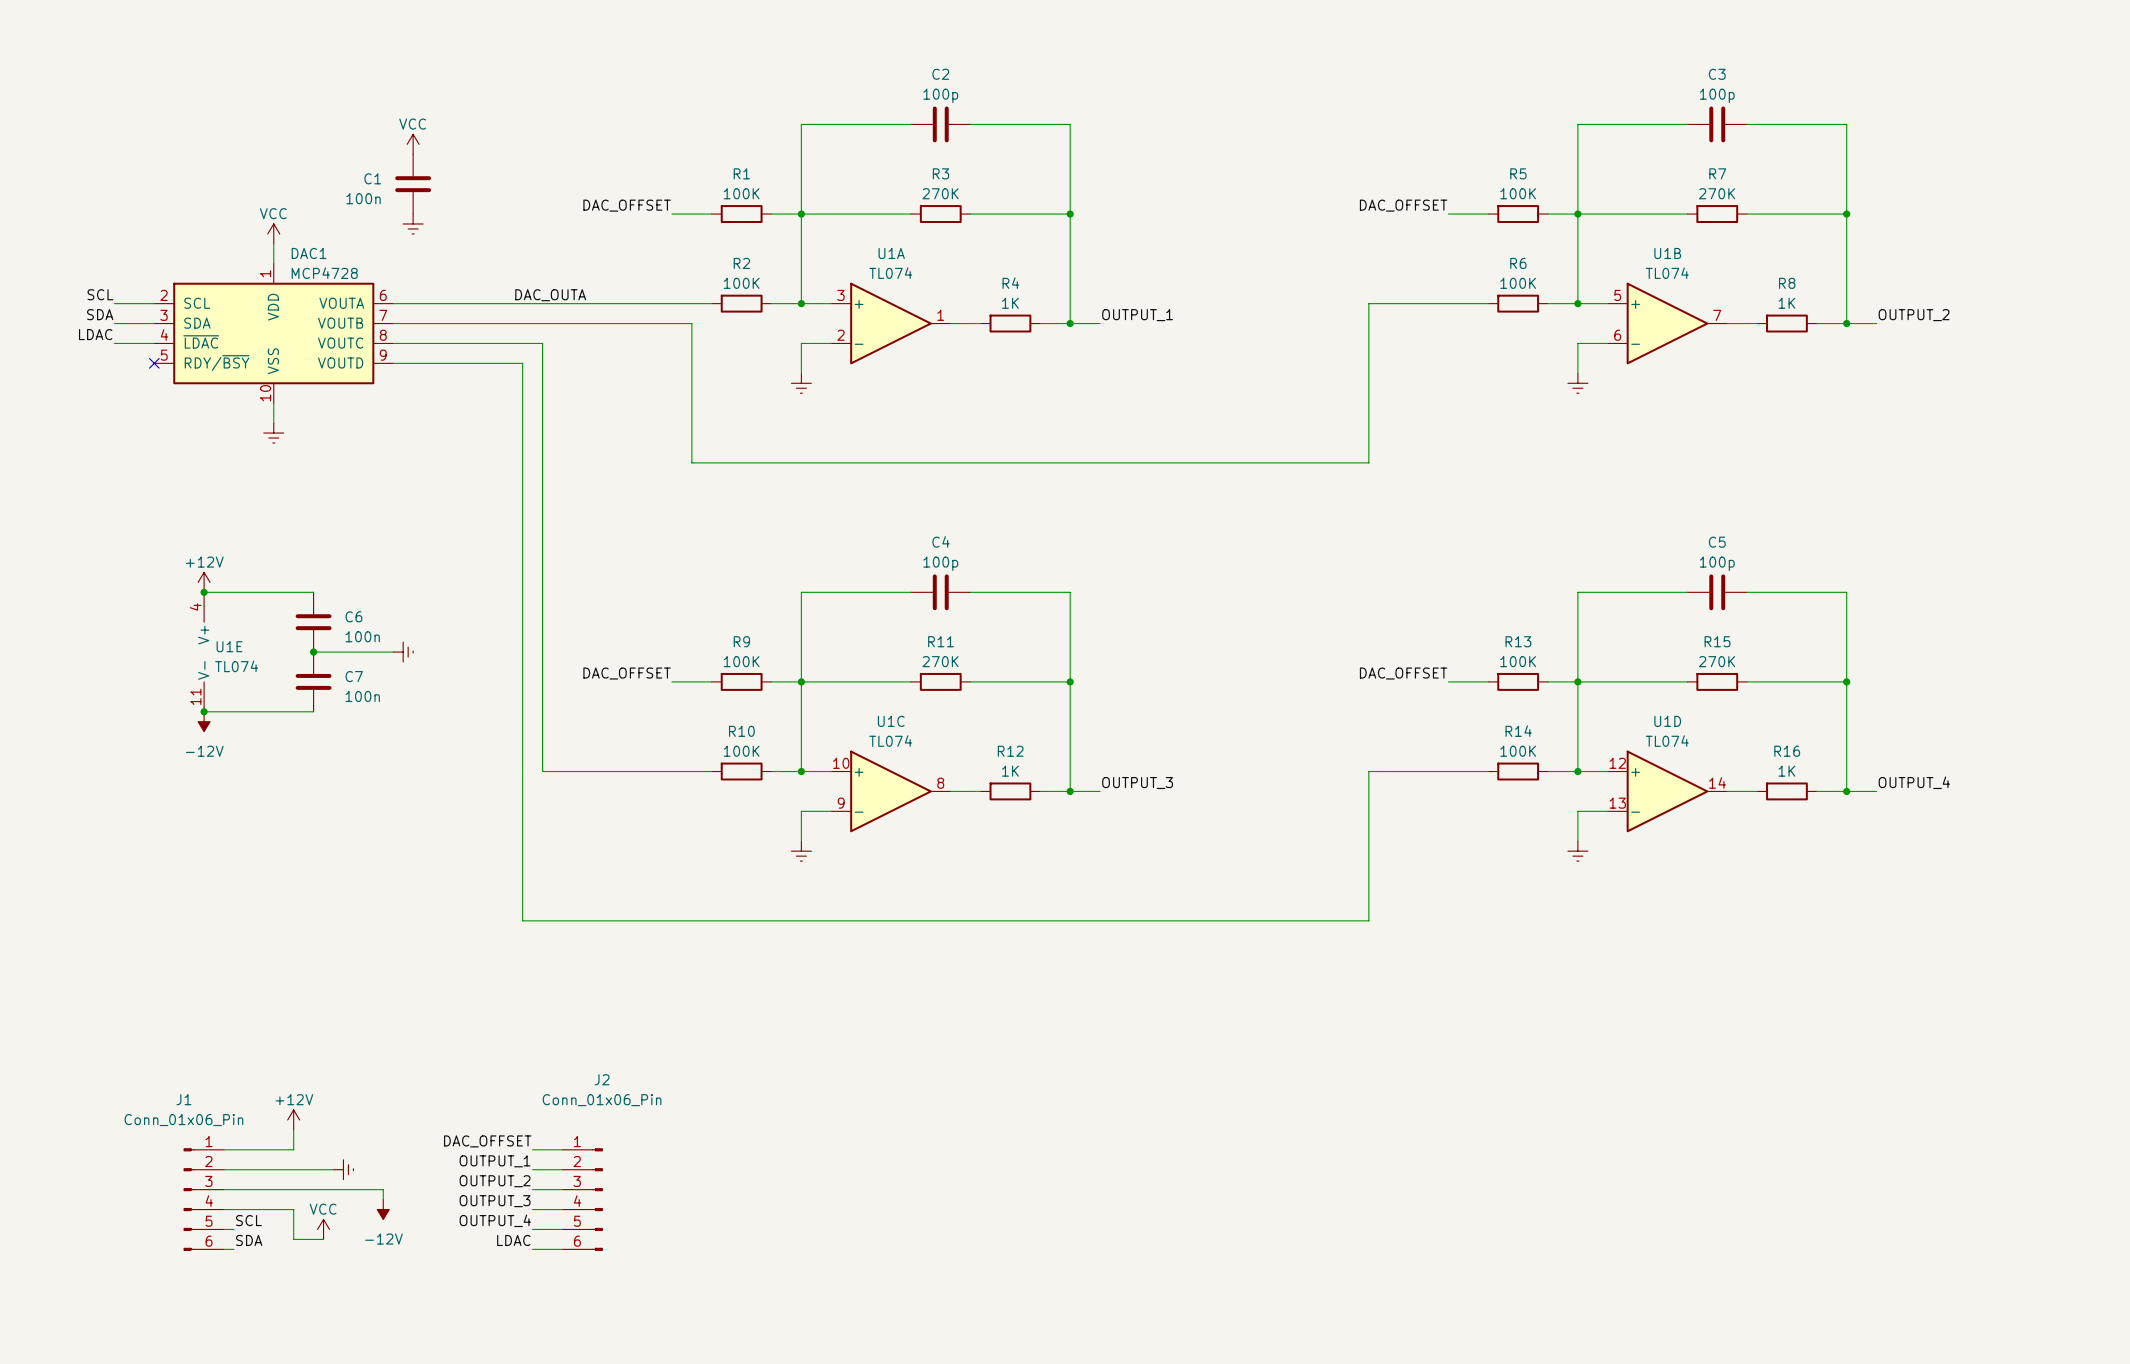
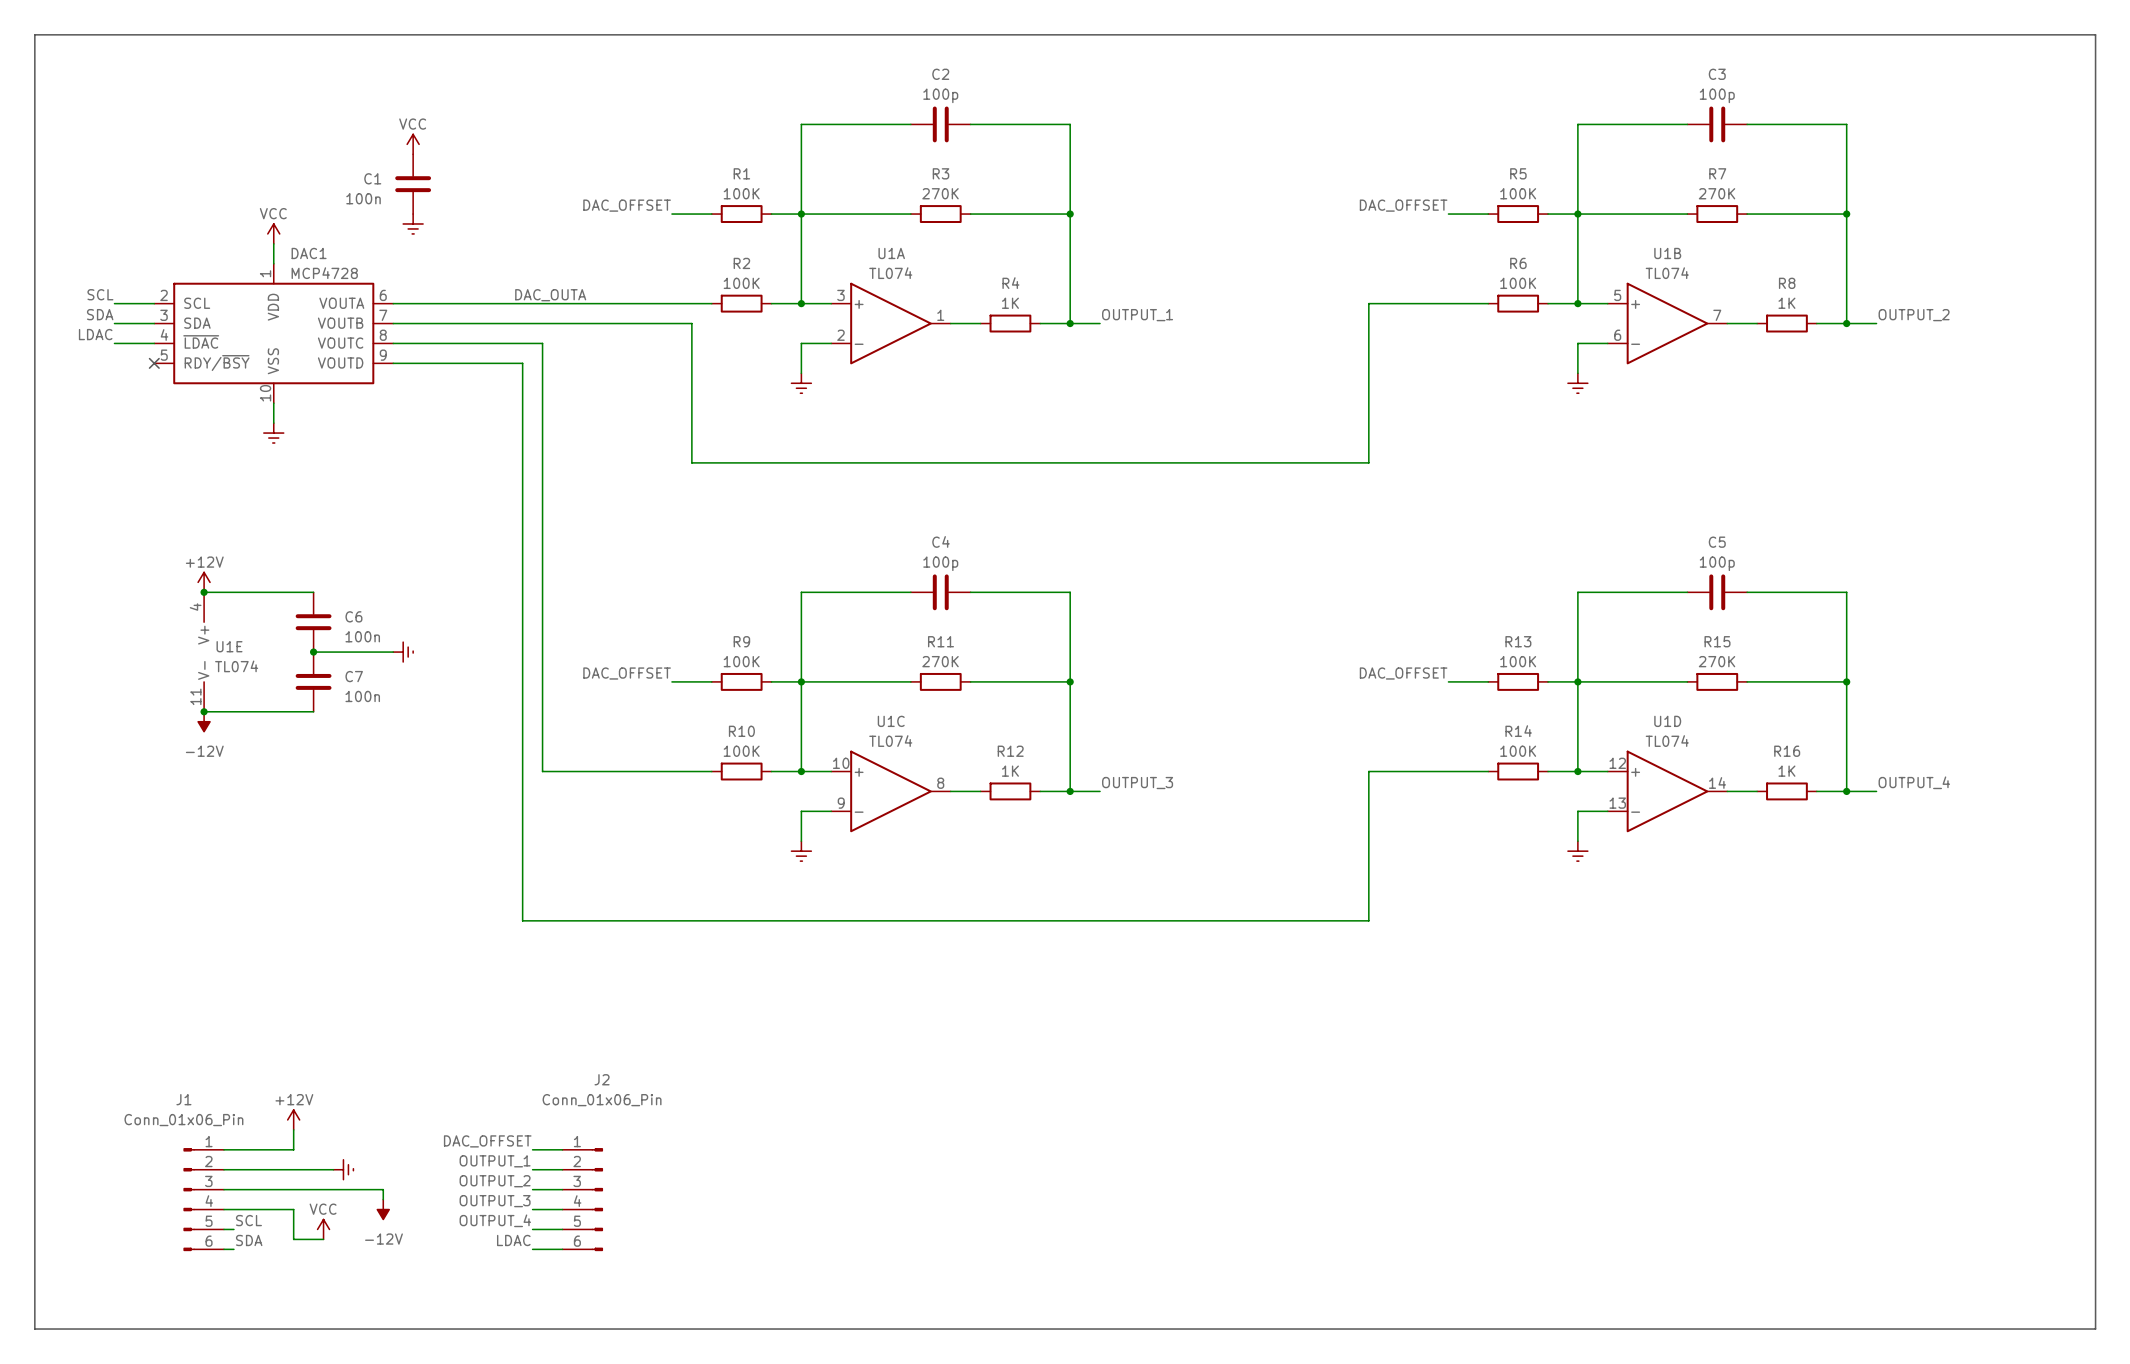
line: none -> (34, 34) (2095, 34) (2095, 1329) (34, 1329) (34, 34)

